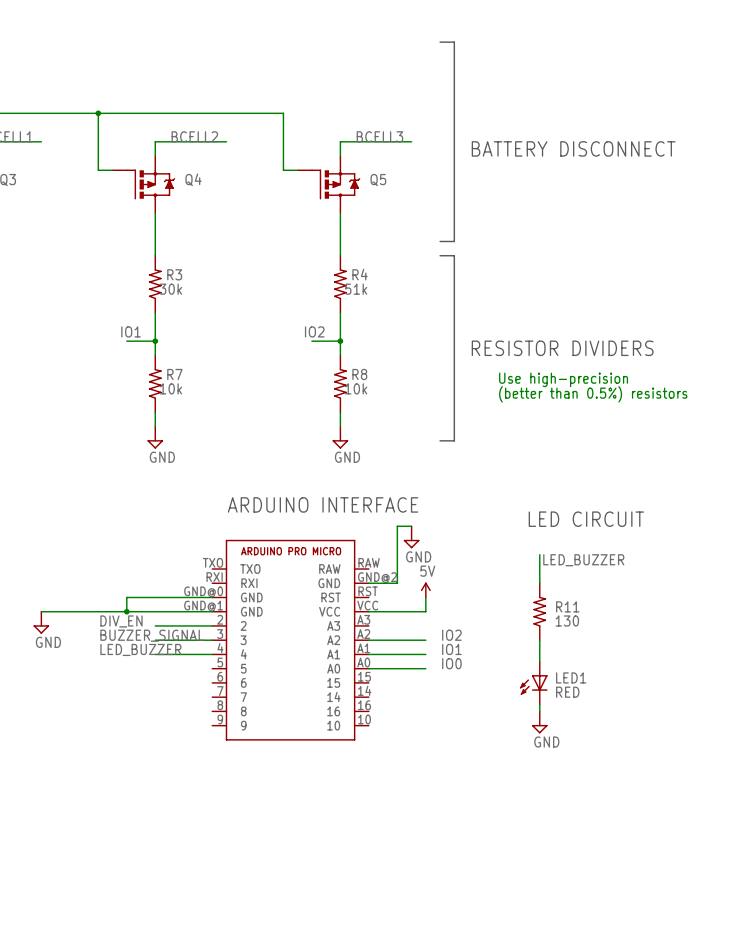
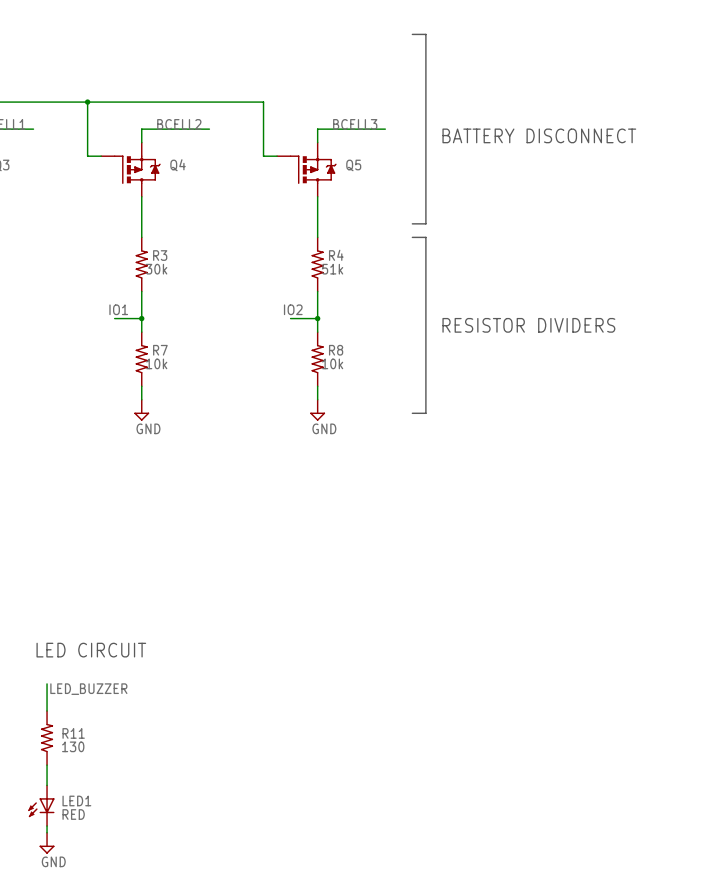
text: Use high-precision (563, 379) -> none
text: (better than 0.5%) resistors (593, 394) -> none
text: ARDUINO INTERFACE (323, 504) -> none
text: LED CIRCUIT (586, 519) -> none
wire: (411, 526) (397, 526) (397, 583) (368, 583) -> none
power symbol: GND (411, 537) -> none
wire: (539, 554) (539, 583) -> none
label: LED_BUZZER (583, 560) -> none
power symbol: 5V (425, 590) -> none
wire: (212, 597) (126, 597) (126, 611) -> none
wire: (425, 597) (425, 611) (368, 611) -> none
wire: (41, 611) (212, 611) -> none
junction: (126, 611) -> none
R11 position: (539, 611) -> (47, 738)
label: DIV_EN (121, 621) -> none
power symbol: GND (41, 622) -> none
wire: (155, 625) (212, 625) -> none
label: BUZZER_SIGNAL (152, 635) -> none
label: IO2 (451, 635) -> none
wire: (155, 640) (212, 640) -> none
part: (290, 640) -> none
wire: (368, 640) (425, 640) -> none
wire: (539, 640) (539, 661) -> none
label position: LED_BUZZER (140, 649) -> LED_BUZZER (88, 689)
label: IO1 (451, 649) -> none
wire: (155, 654) (212, 654) -> none
wire: (368, 654) (425, 654) -> none
label: IO0 (451, 663) -> none
wire: (368, 668) (425, 668) -> none
LED1 position: (533, 682) -> (41, 805)
text: none -> LED CIRCUIT (91, 650)
wire: (539, 704) (539, 711) -> none
power symbol: GND (539, 722) -> none
wire: none -> (47, 683) (47, 710)
wire: none -> (47, 765) (47, 785)
wire: none -> (47, 826) (47, 832)
power symbol: none -> GND (47, 843)

